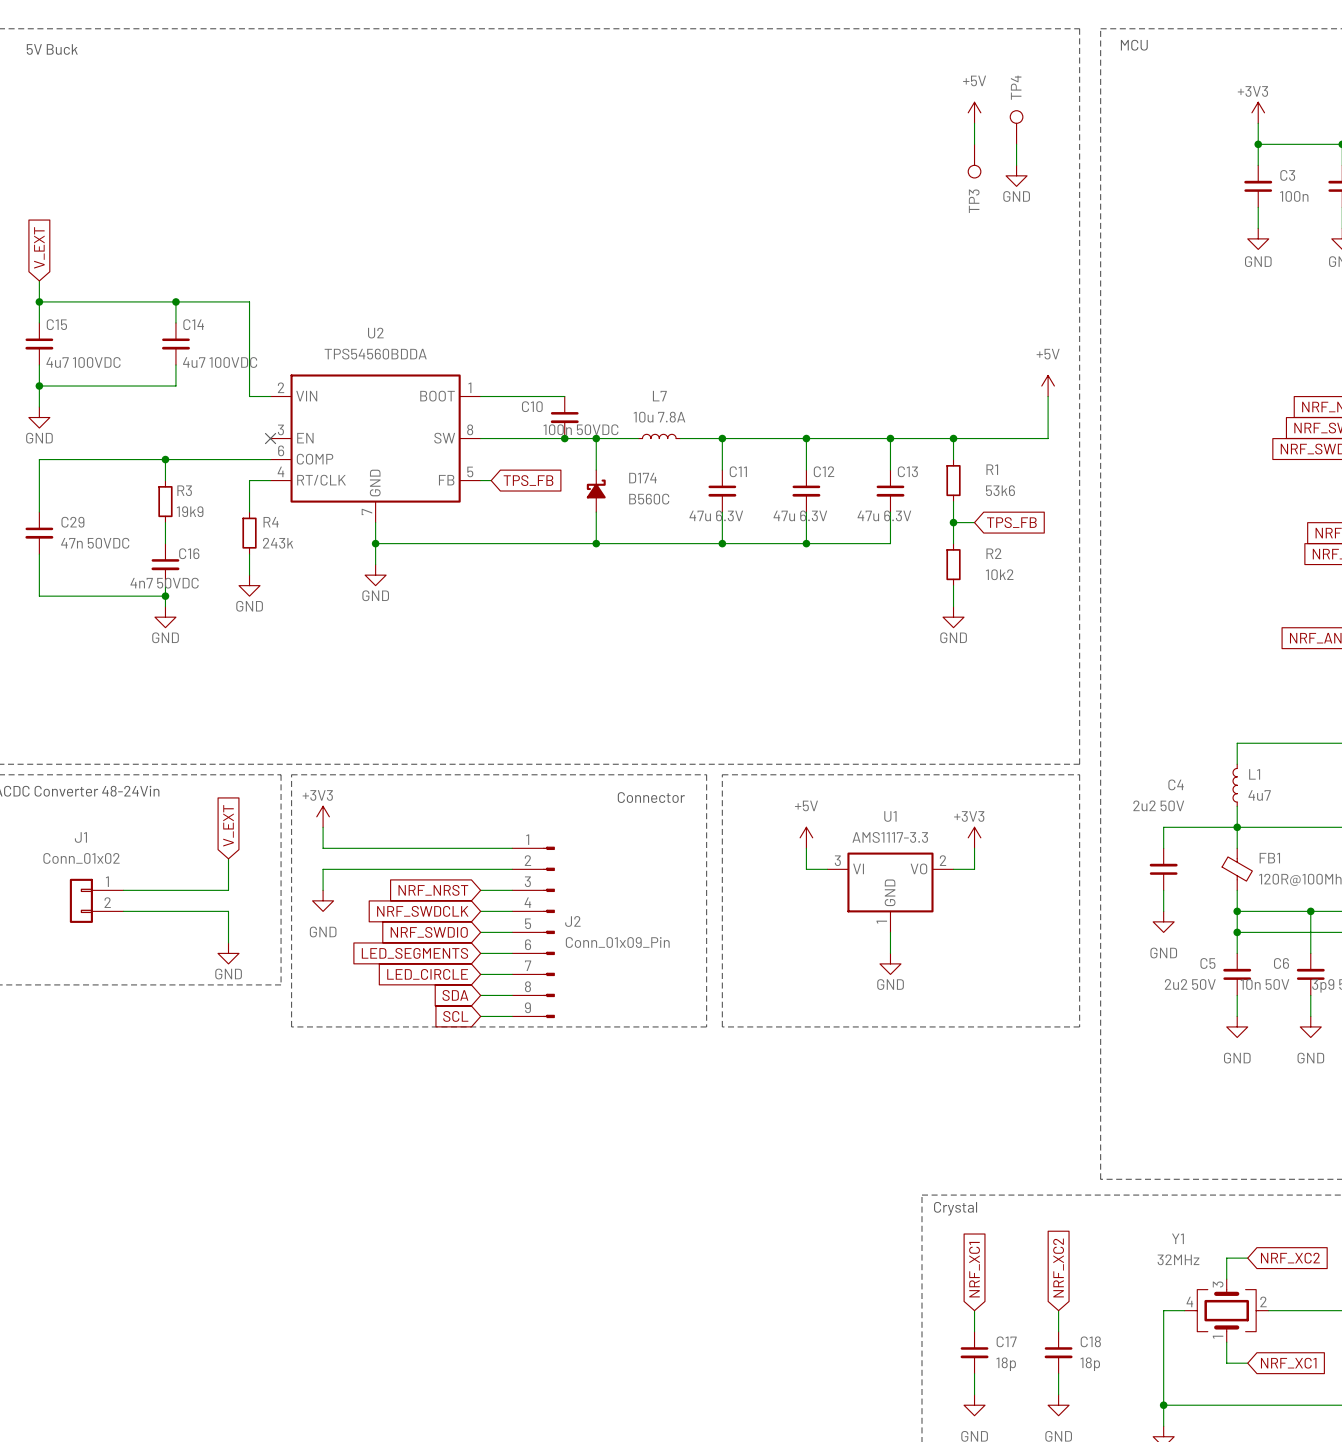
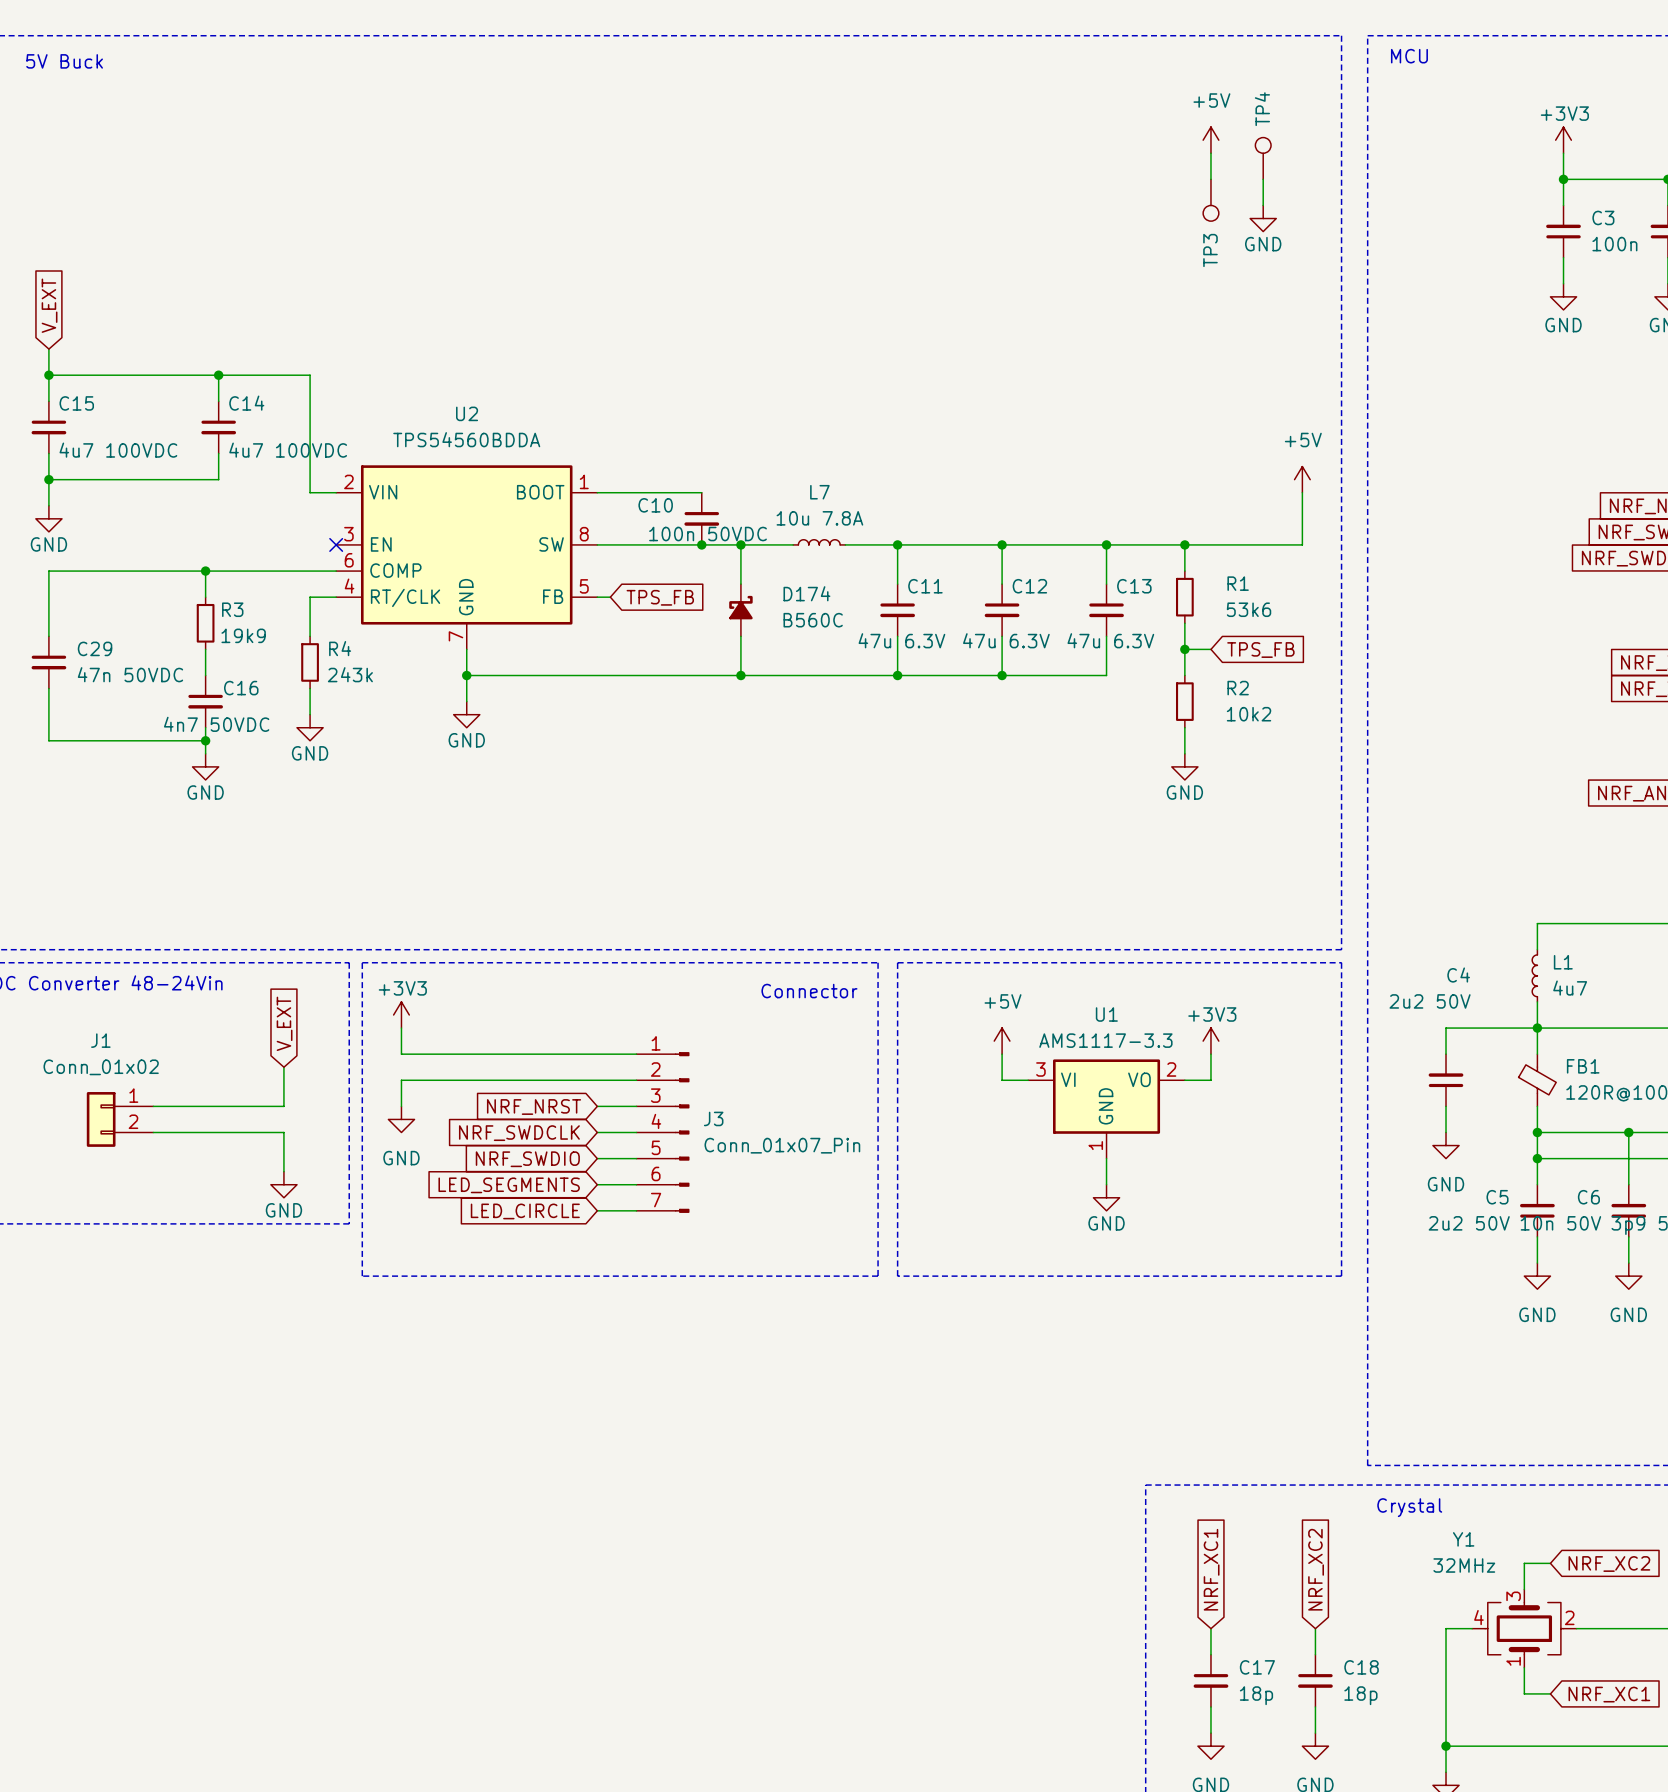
J3: none -> Conn_01x07_Pin (662, 1132)
J2: Conn_01x09_Pin (533, 932) -> none
global label: SDA (455, 995) -> none
wire: (480, 995) (512, 995) -> none
global label: SCL (455, 1016) -> none
wire: (480, 1016) (512, 1016) -> none
text position: Crystal (955, 1208) -> Crystal (1409, 1507)

